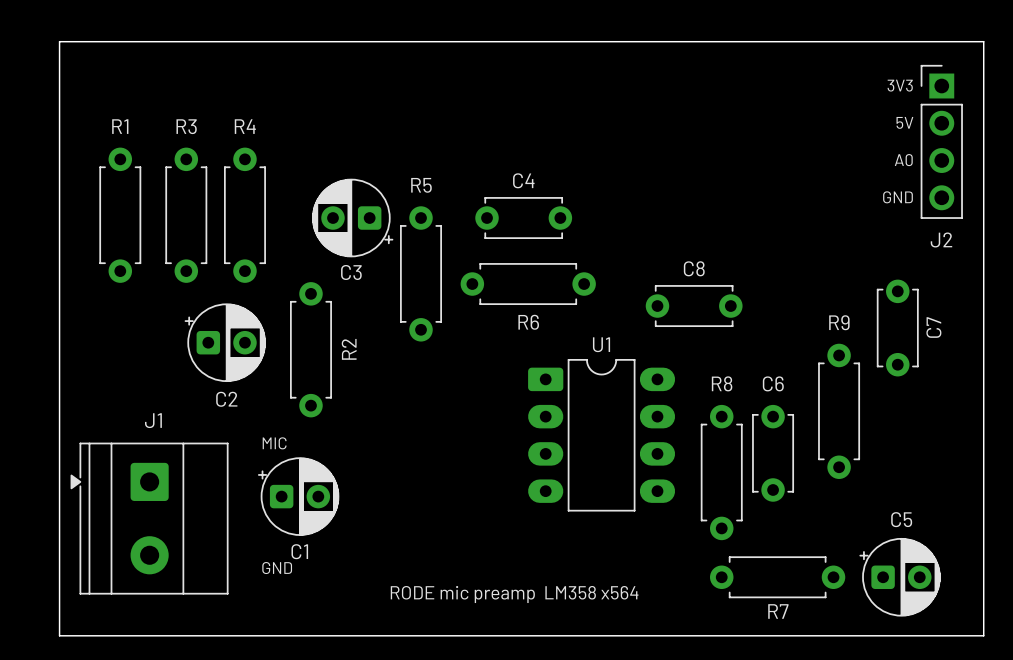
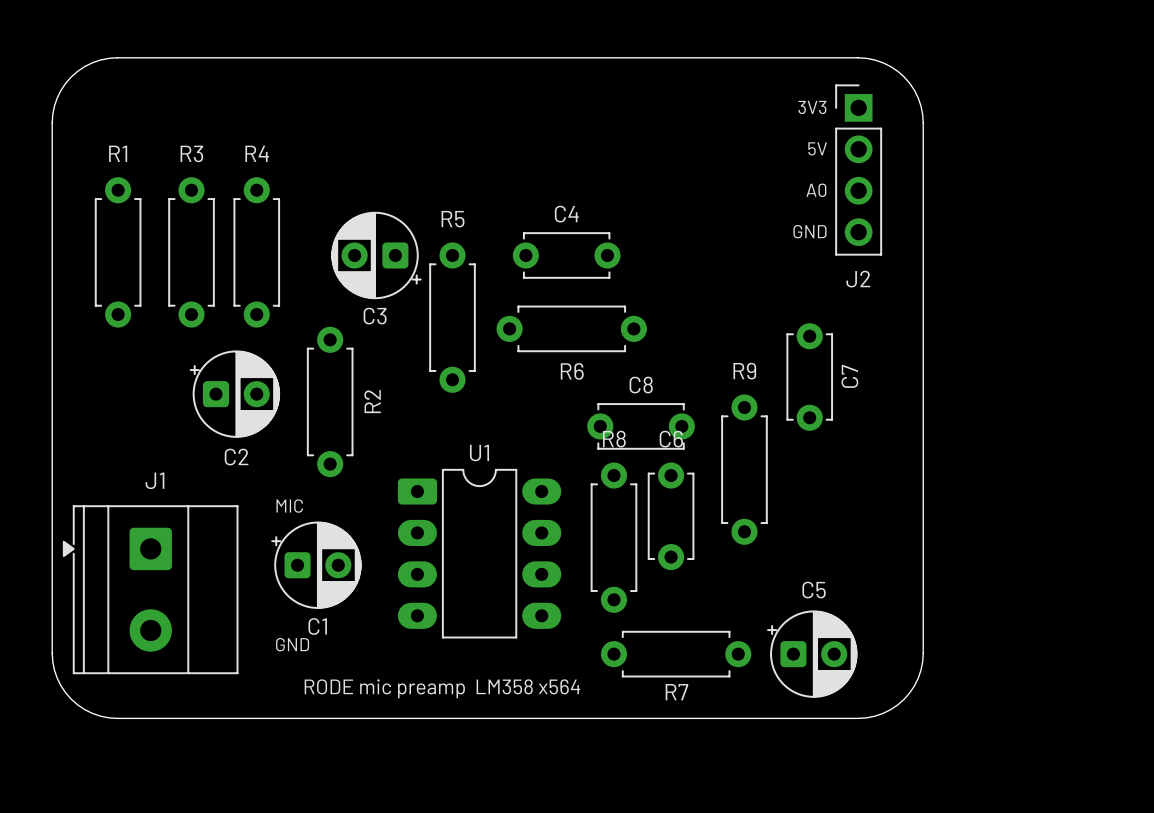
board edge: (59, 41) (983, 41) (983, 635) (59, 635) (59, 41) -> (117, 57) (92, 62) (71, 76) (57, 98) (52, 123) (52, 653) (57, 678) (65, 692) (77, 704) (100, 716) (117, 718) (858, 718) (874, 716) (890, 709) (909, 692) (918, 678) (923, 653) (923, 123) (921, 106) (914, 90) (897, 71) (882, 62) (858, 57) (117, 57)
text position: 3V3 (900, 85) -> 3V3 (812, 107)
text position: 5V (904, 122) -> 5V (817, 148)
J2 position: (941, 141) -> (858, 170)
text position: A0 (903, 160) -> A0 (816, 190)
text position: GND (897, 197) -> GND (809, 231)
C8 position: (694, 306) -> (641, 426)
C7 position: (897, 328) -> (809, 377)
R9 position: (839, 411) -> (744, 469)
U1 position: (601, 435) -> (479, 553)
C6 position: (773, 453) -> (671, 516)
R8 position: (721, 472) -> (613, 537)
R7 position: (777, 577) -> (676, 654)
C5 position: (900, 577) -> (812, 654)
text position: RODE mic preamp LM358 x564 (514, 594) -> RODE mic preamp LM358 x564 (442, 688)

